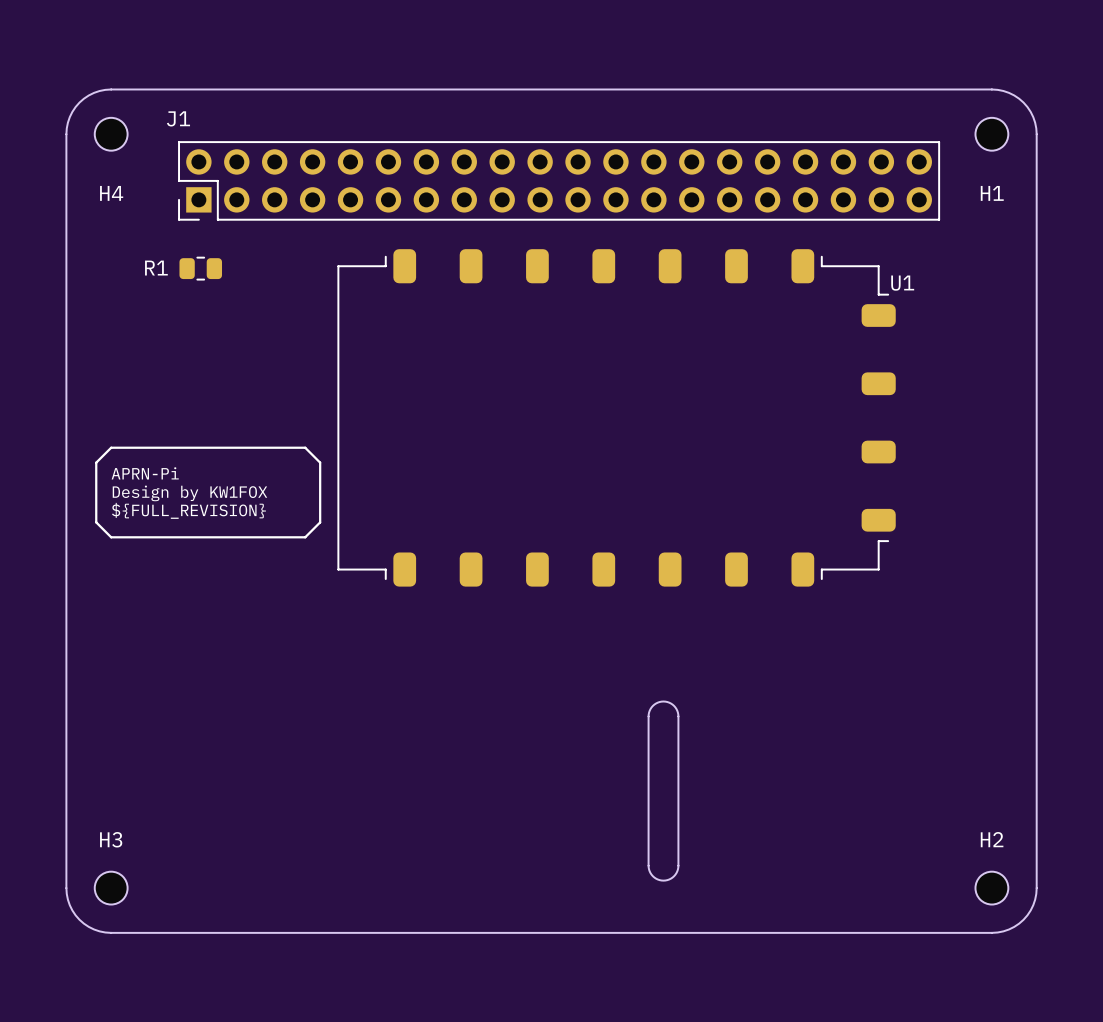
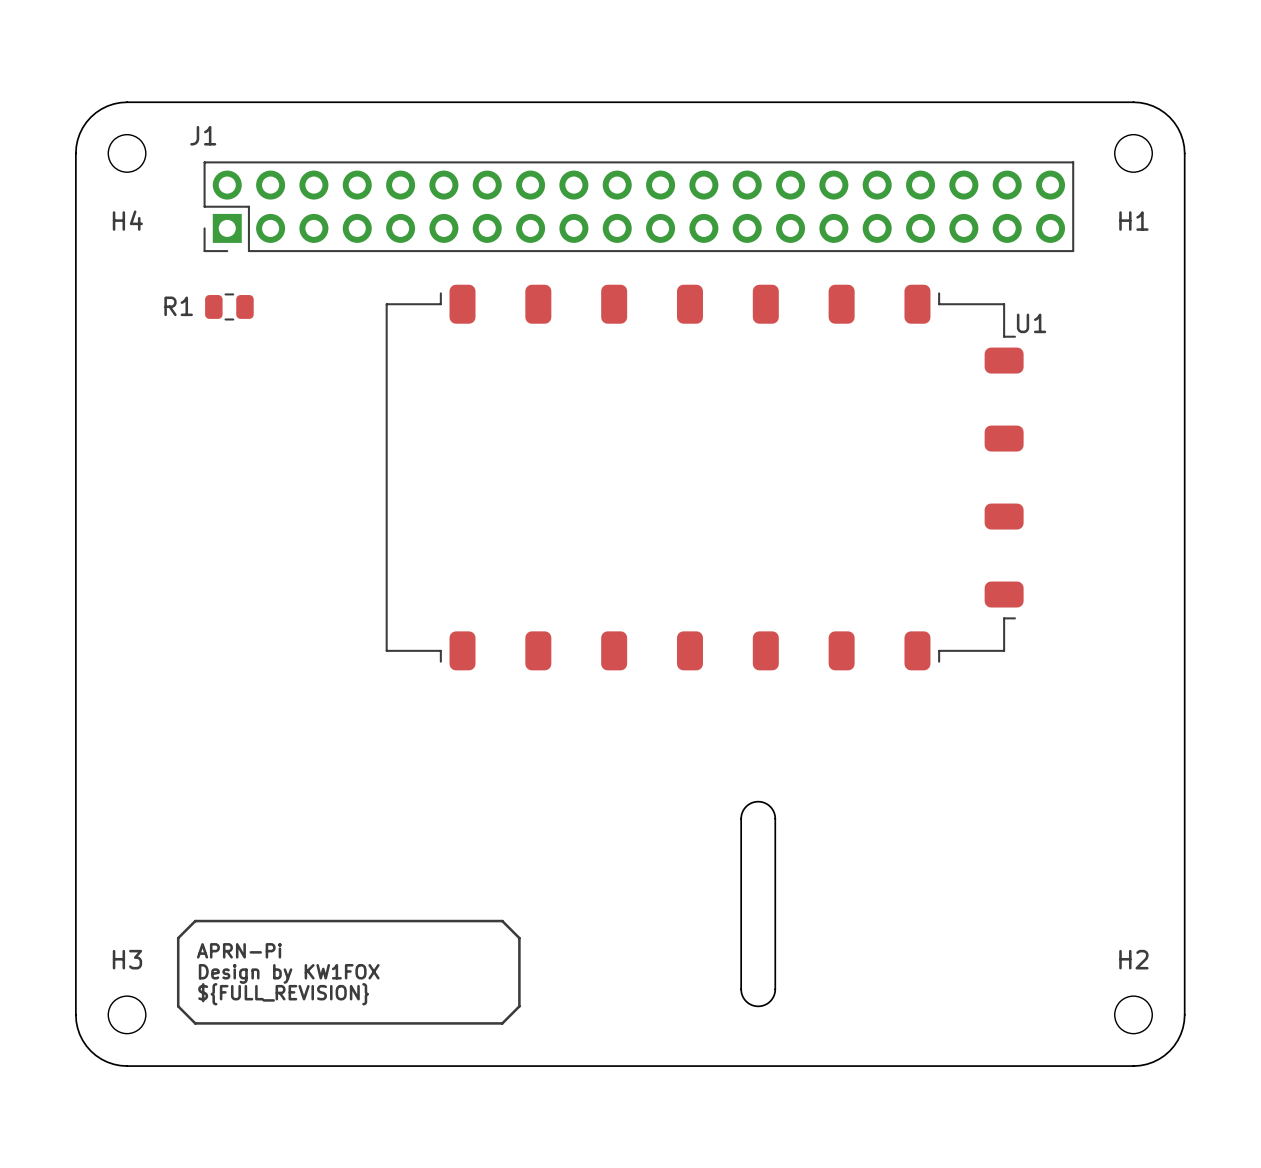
line: (111, 447) (305, 447) (320, 462) (320, 522) (305, 537) (111, 537) (96, 522) (96, 462) (111, 447) -> none
text position: APRN-Pi (145, 473) -> APRN-Pi (239, 950)
text position: Design by KW1FOX (189, 493) -> Design by KW1FOX (289, 973)
text position: ${FULL_REVISION} (188, 510) -> ${FULL_REVISION} (283, 994)
line: none -> (195, 921) (502, 921) (519, 938) (519, 1006) (502, 1023) (195, 1023) (178, 1006) (178, 938) (195, 921)

